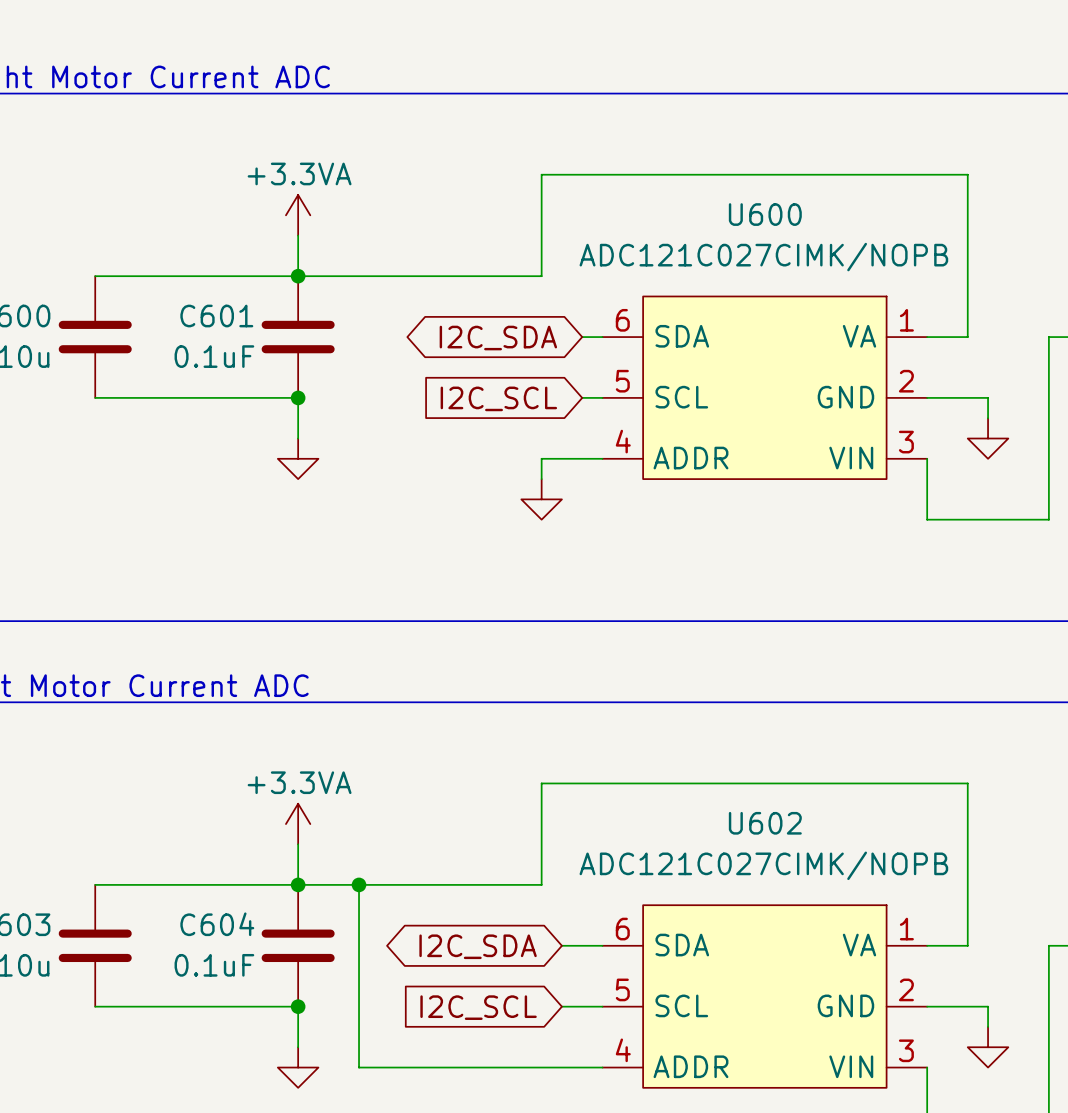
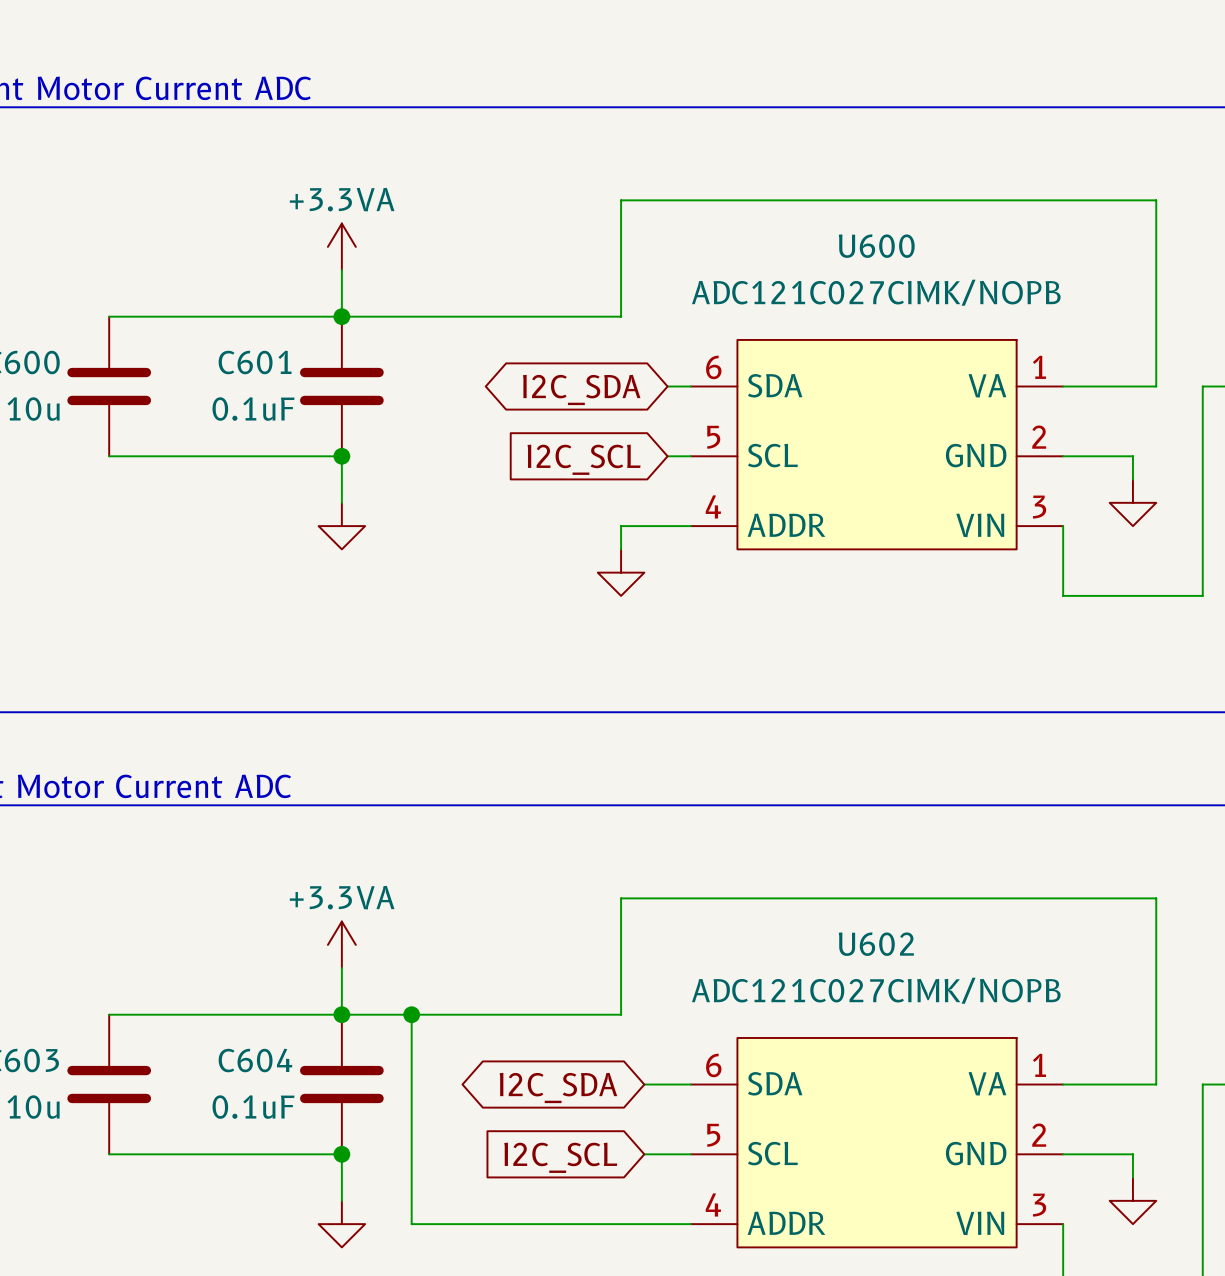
wire: (967, 174) (967, 337) -> (1109, 200) (1156, 200) (1156, 386) (1109, 386)
wire: (967, 783) (967, 945) -> (1109, 898) (1156, 898) (1156, 1084) (1109, 1084)

